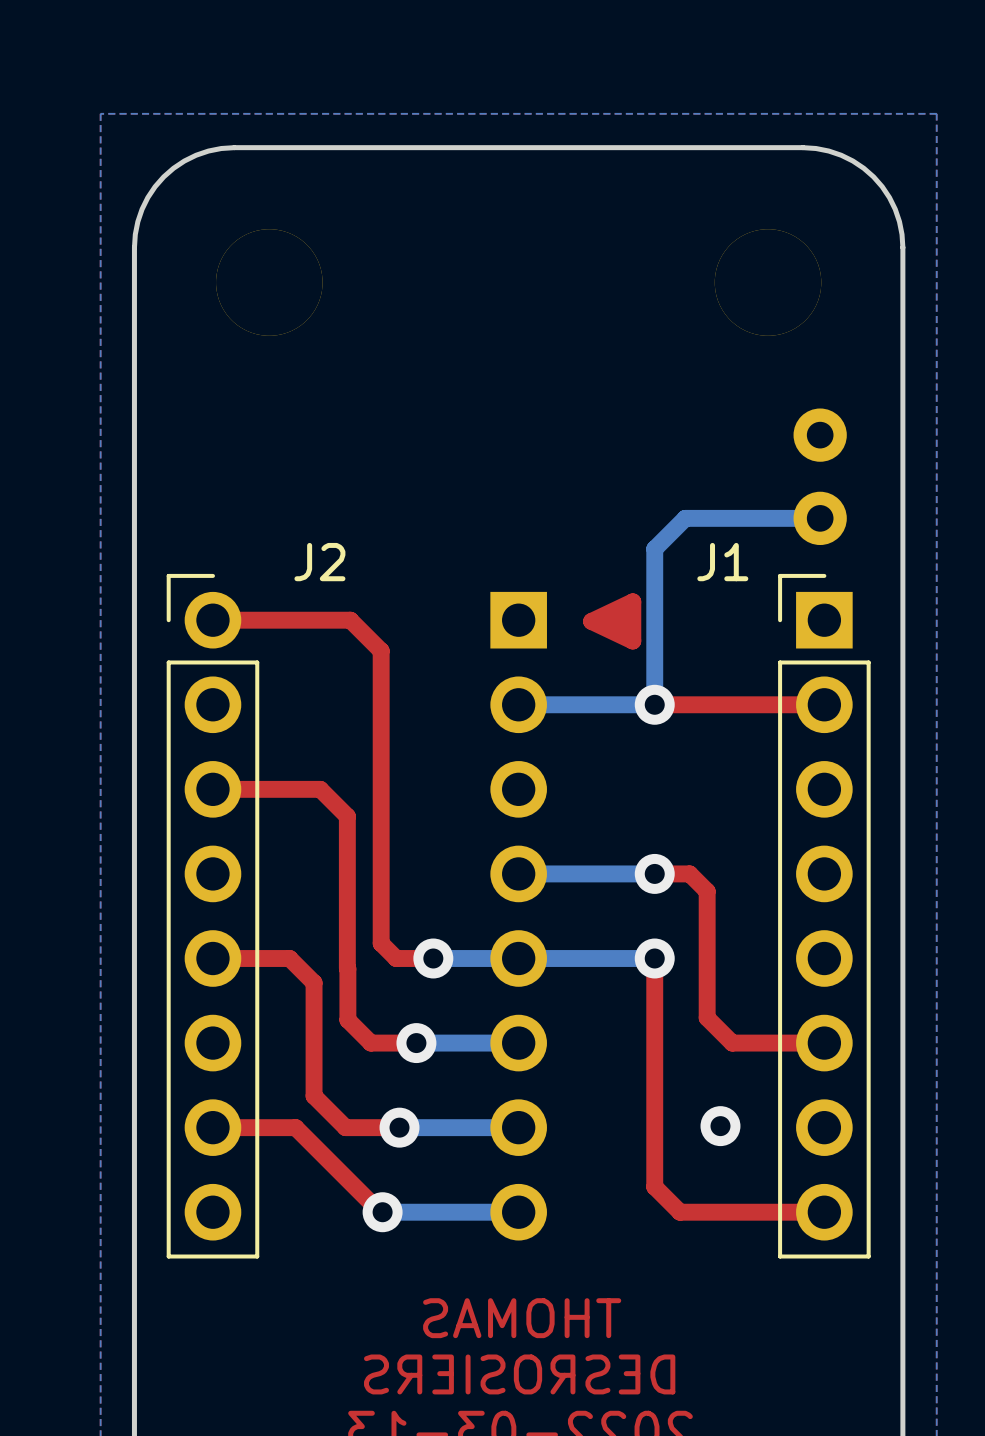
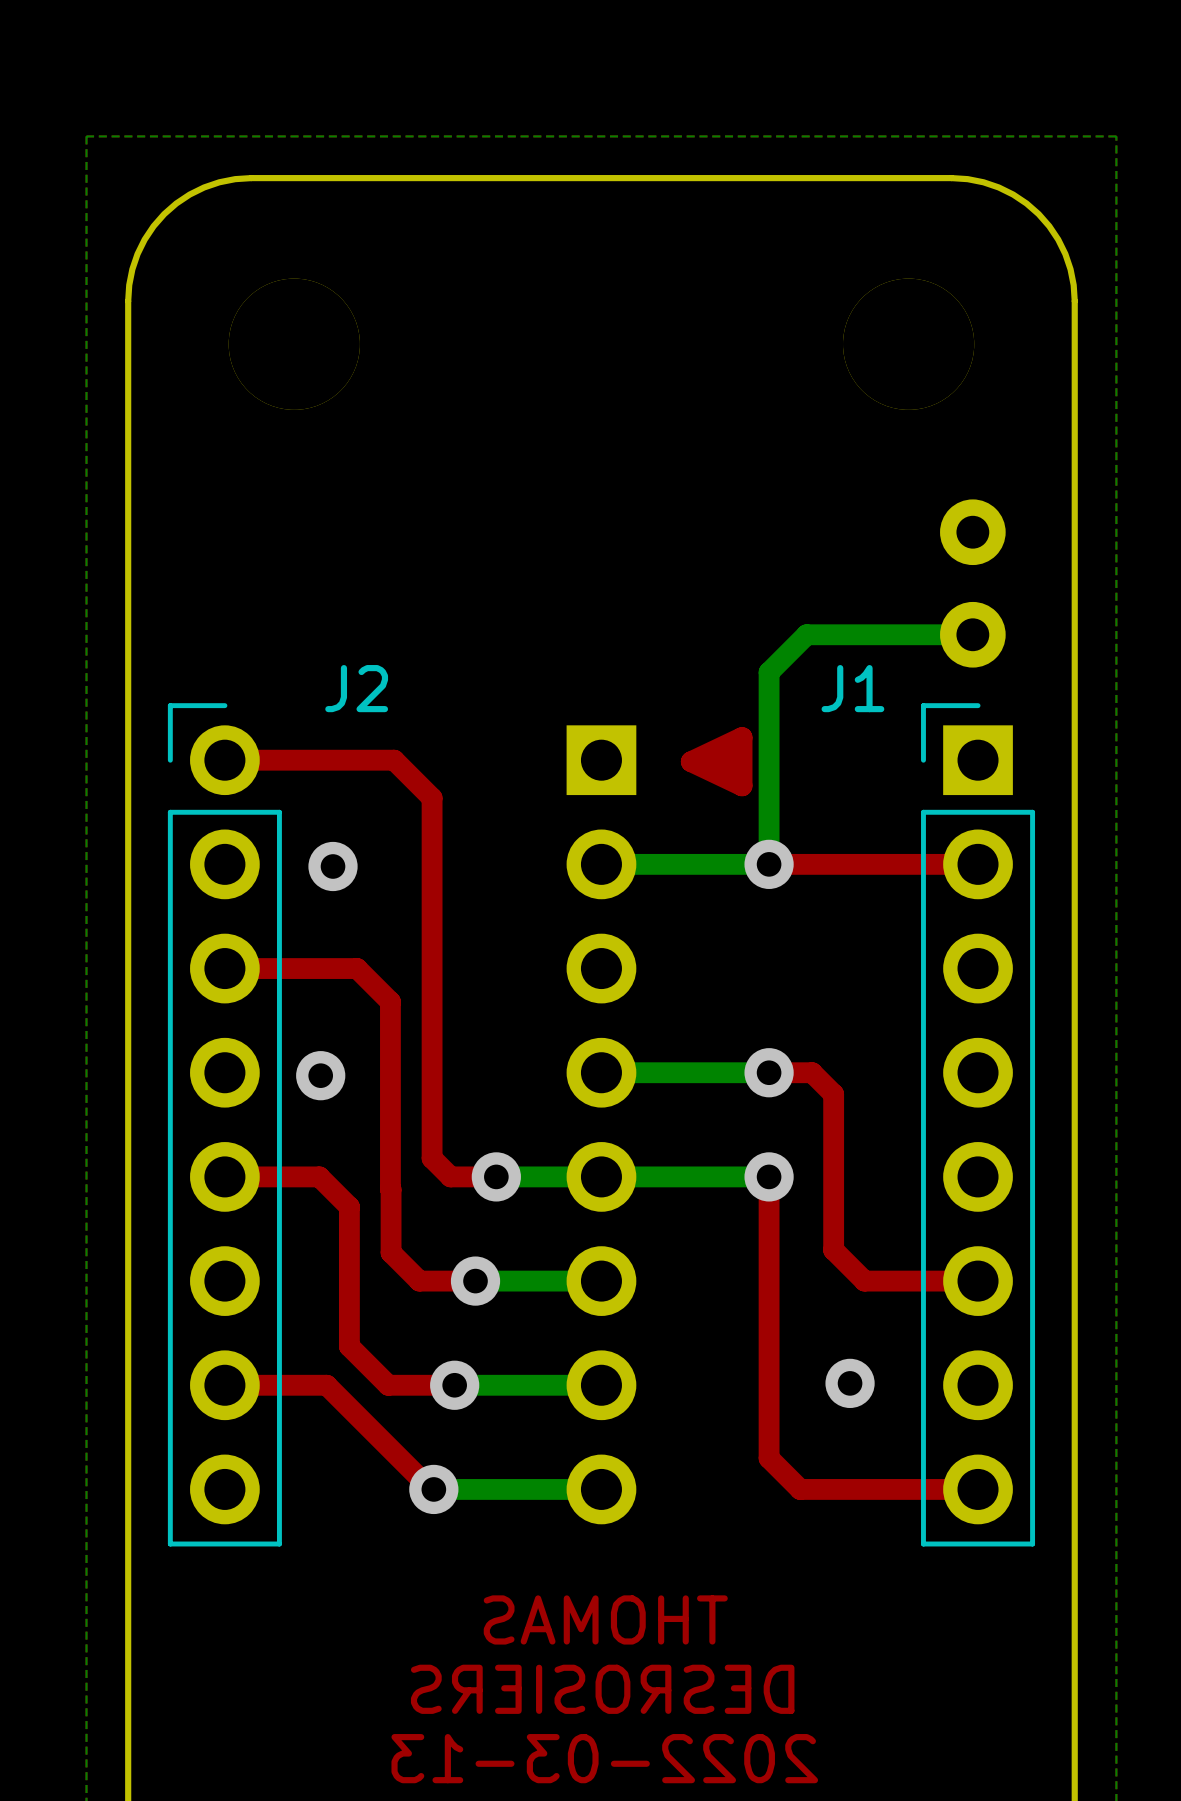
via: none -> (333, 866)
via: none -> (320, 1075)

